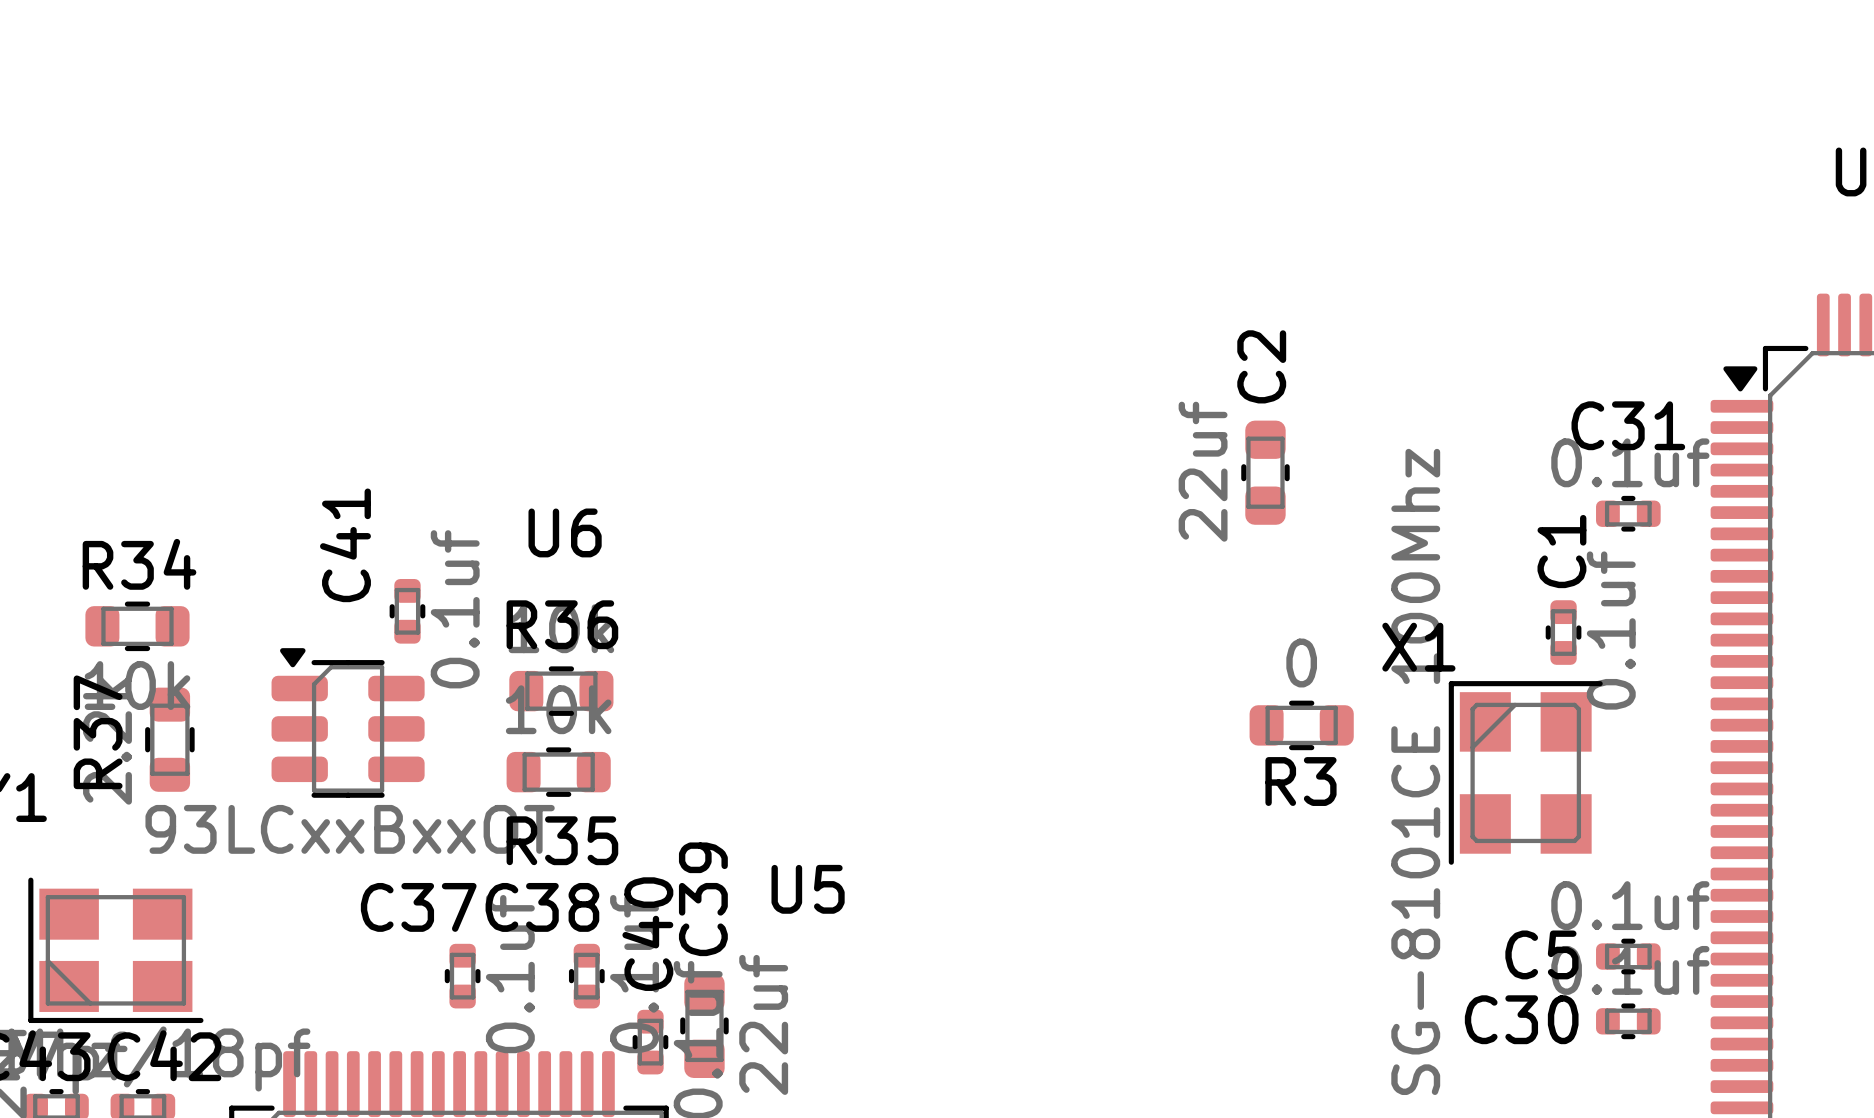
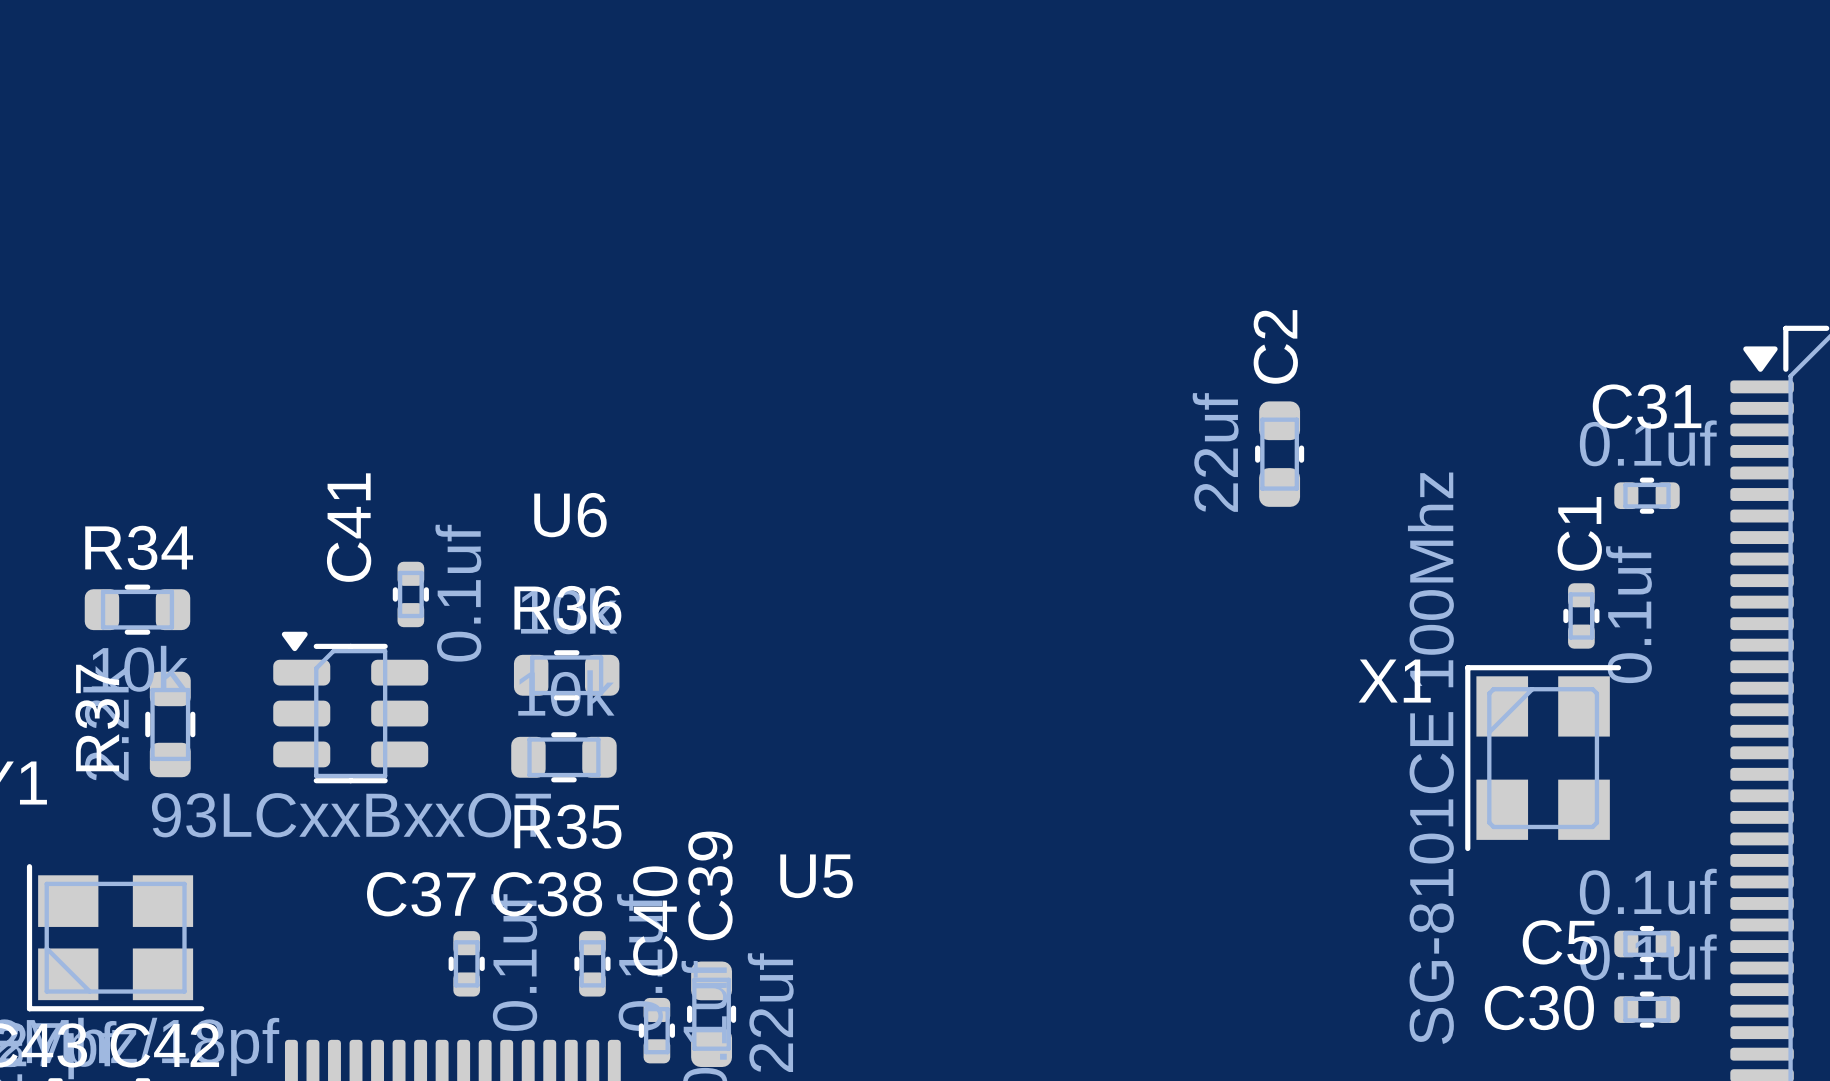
X1 name position: X1 (1418, 647) -> X1 (1394, 681)
R3: 0 (1301, 725) -> none

